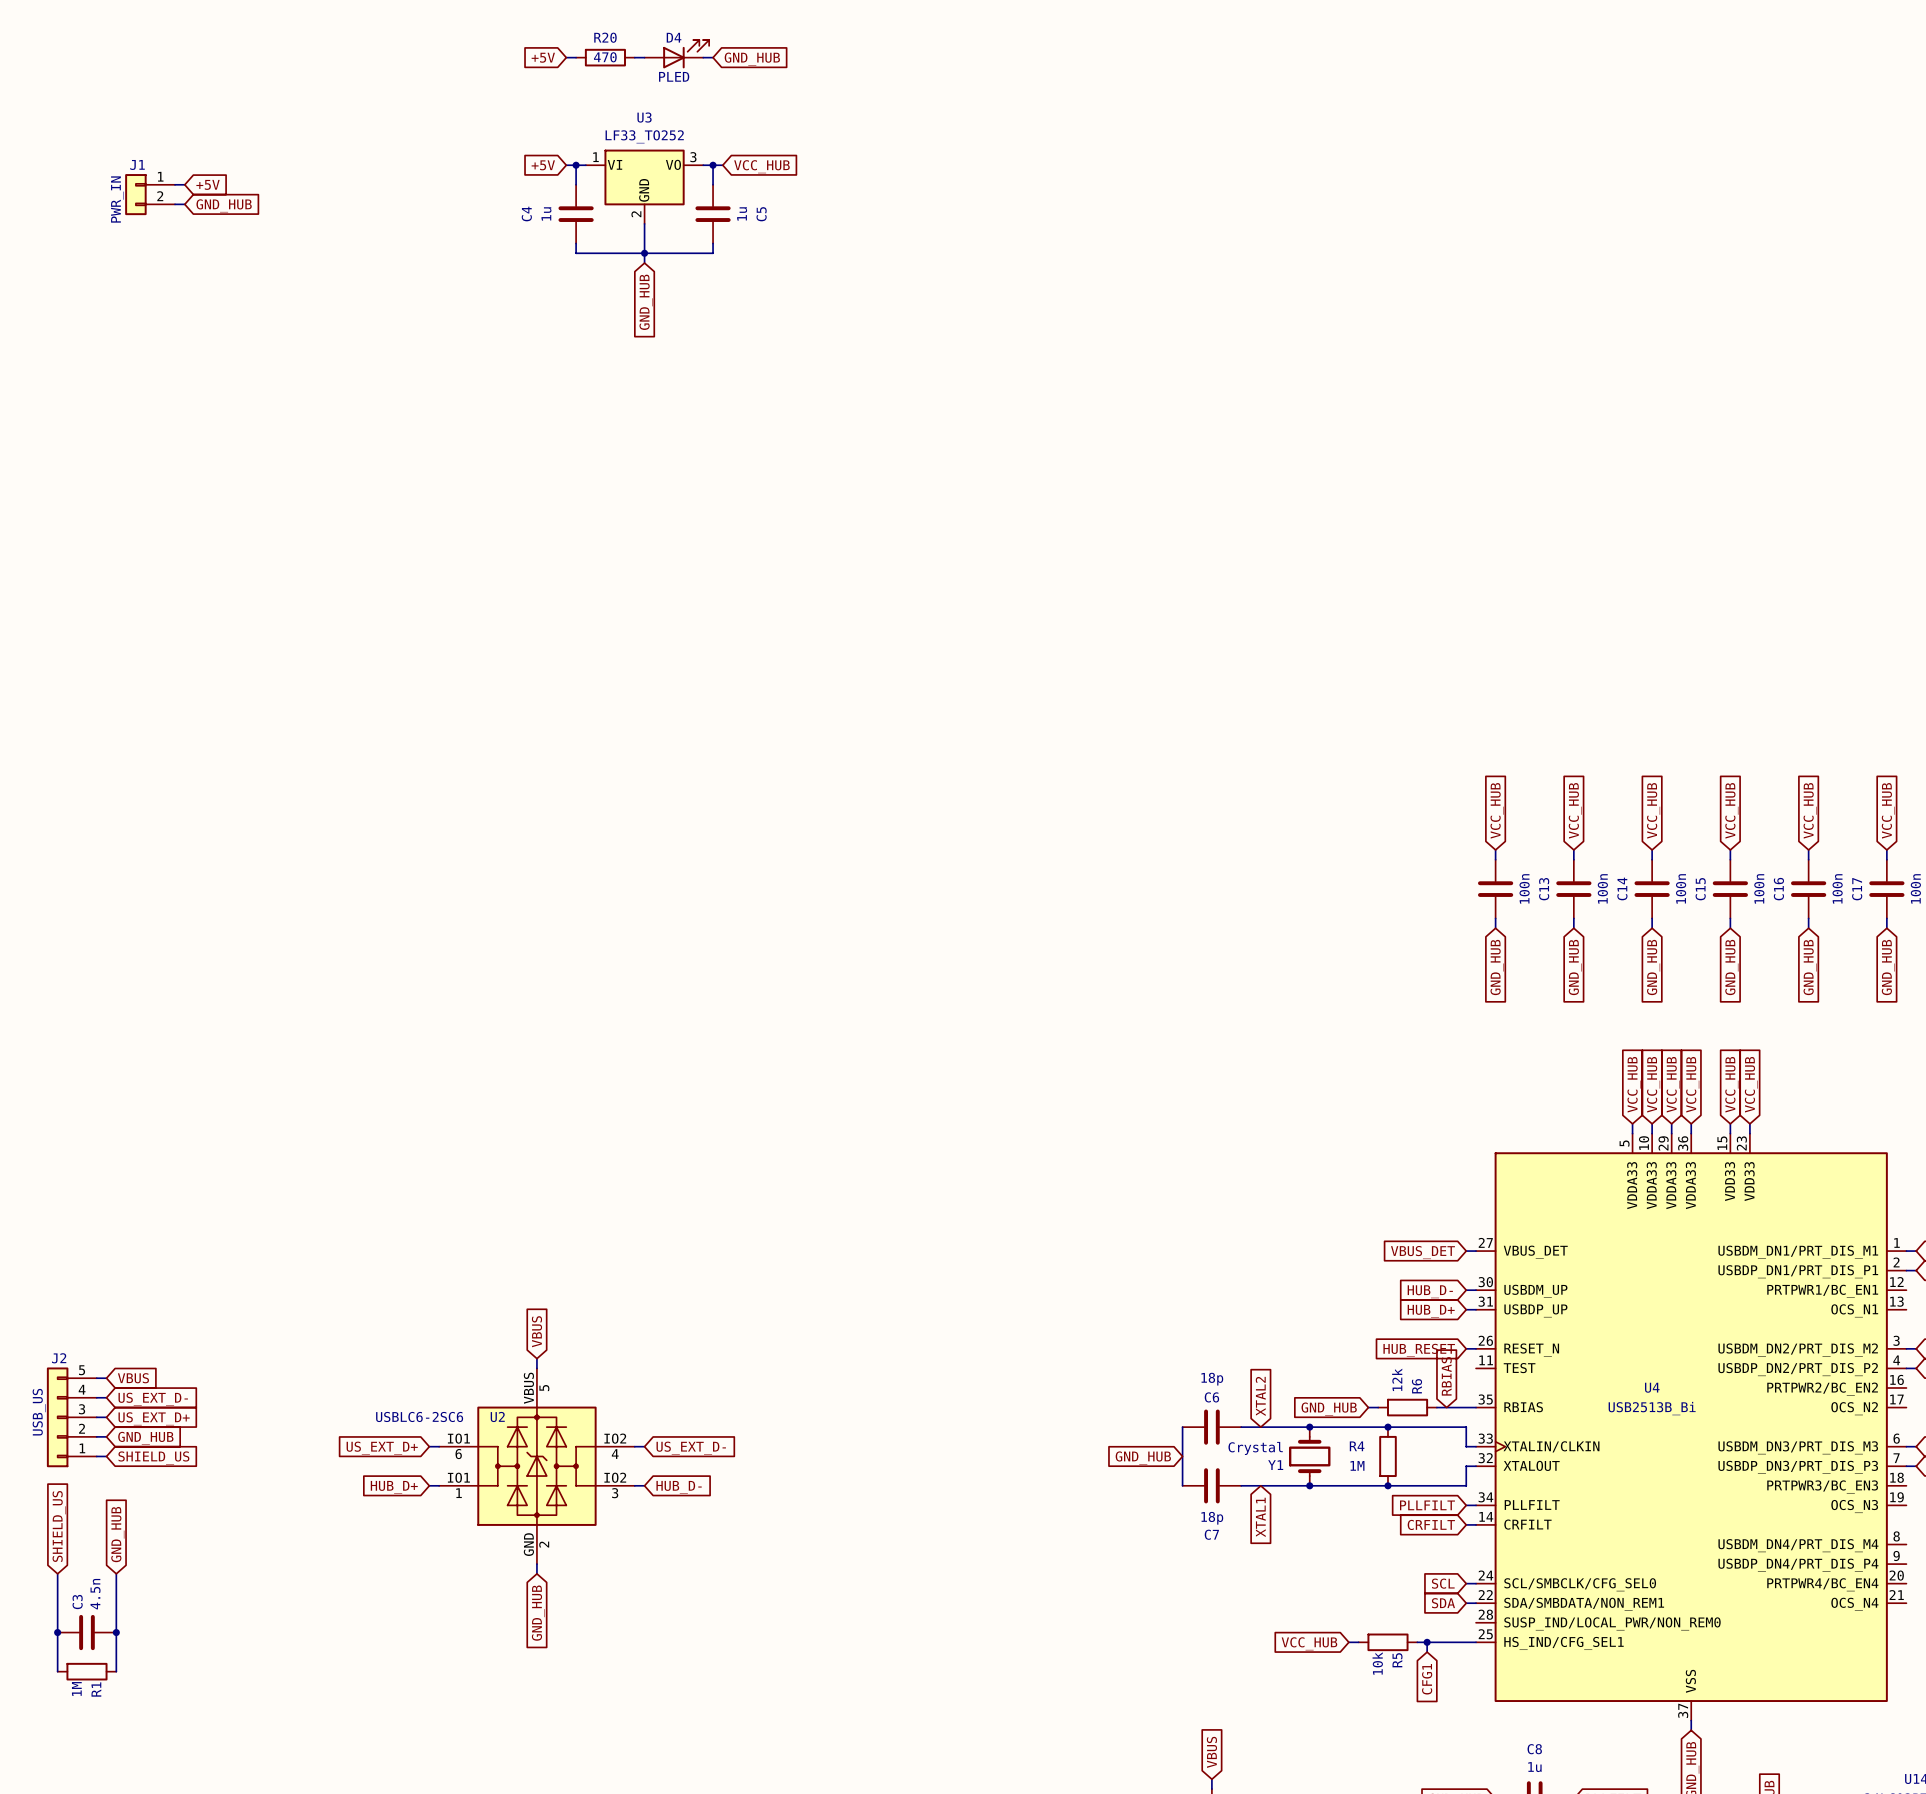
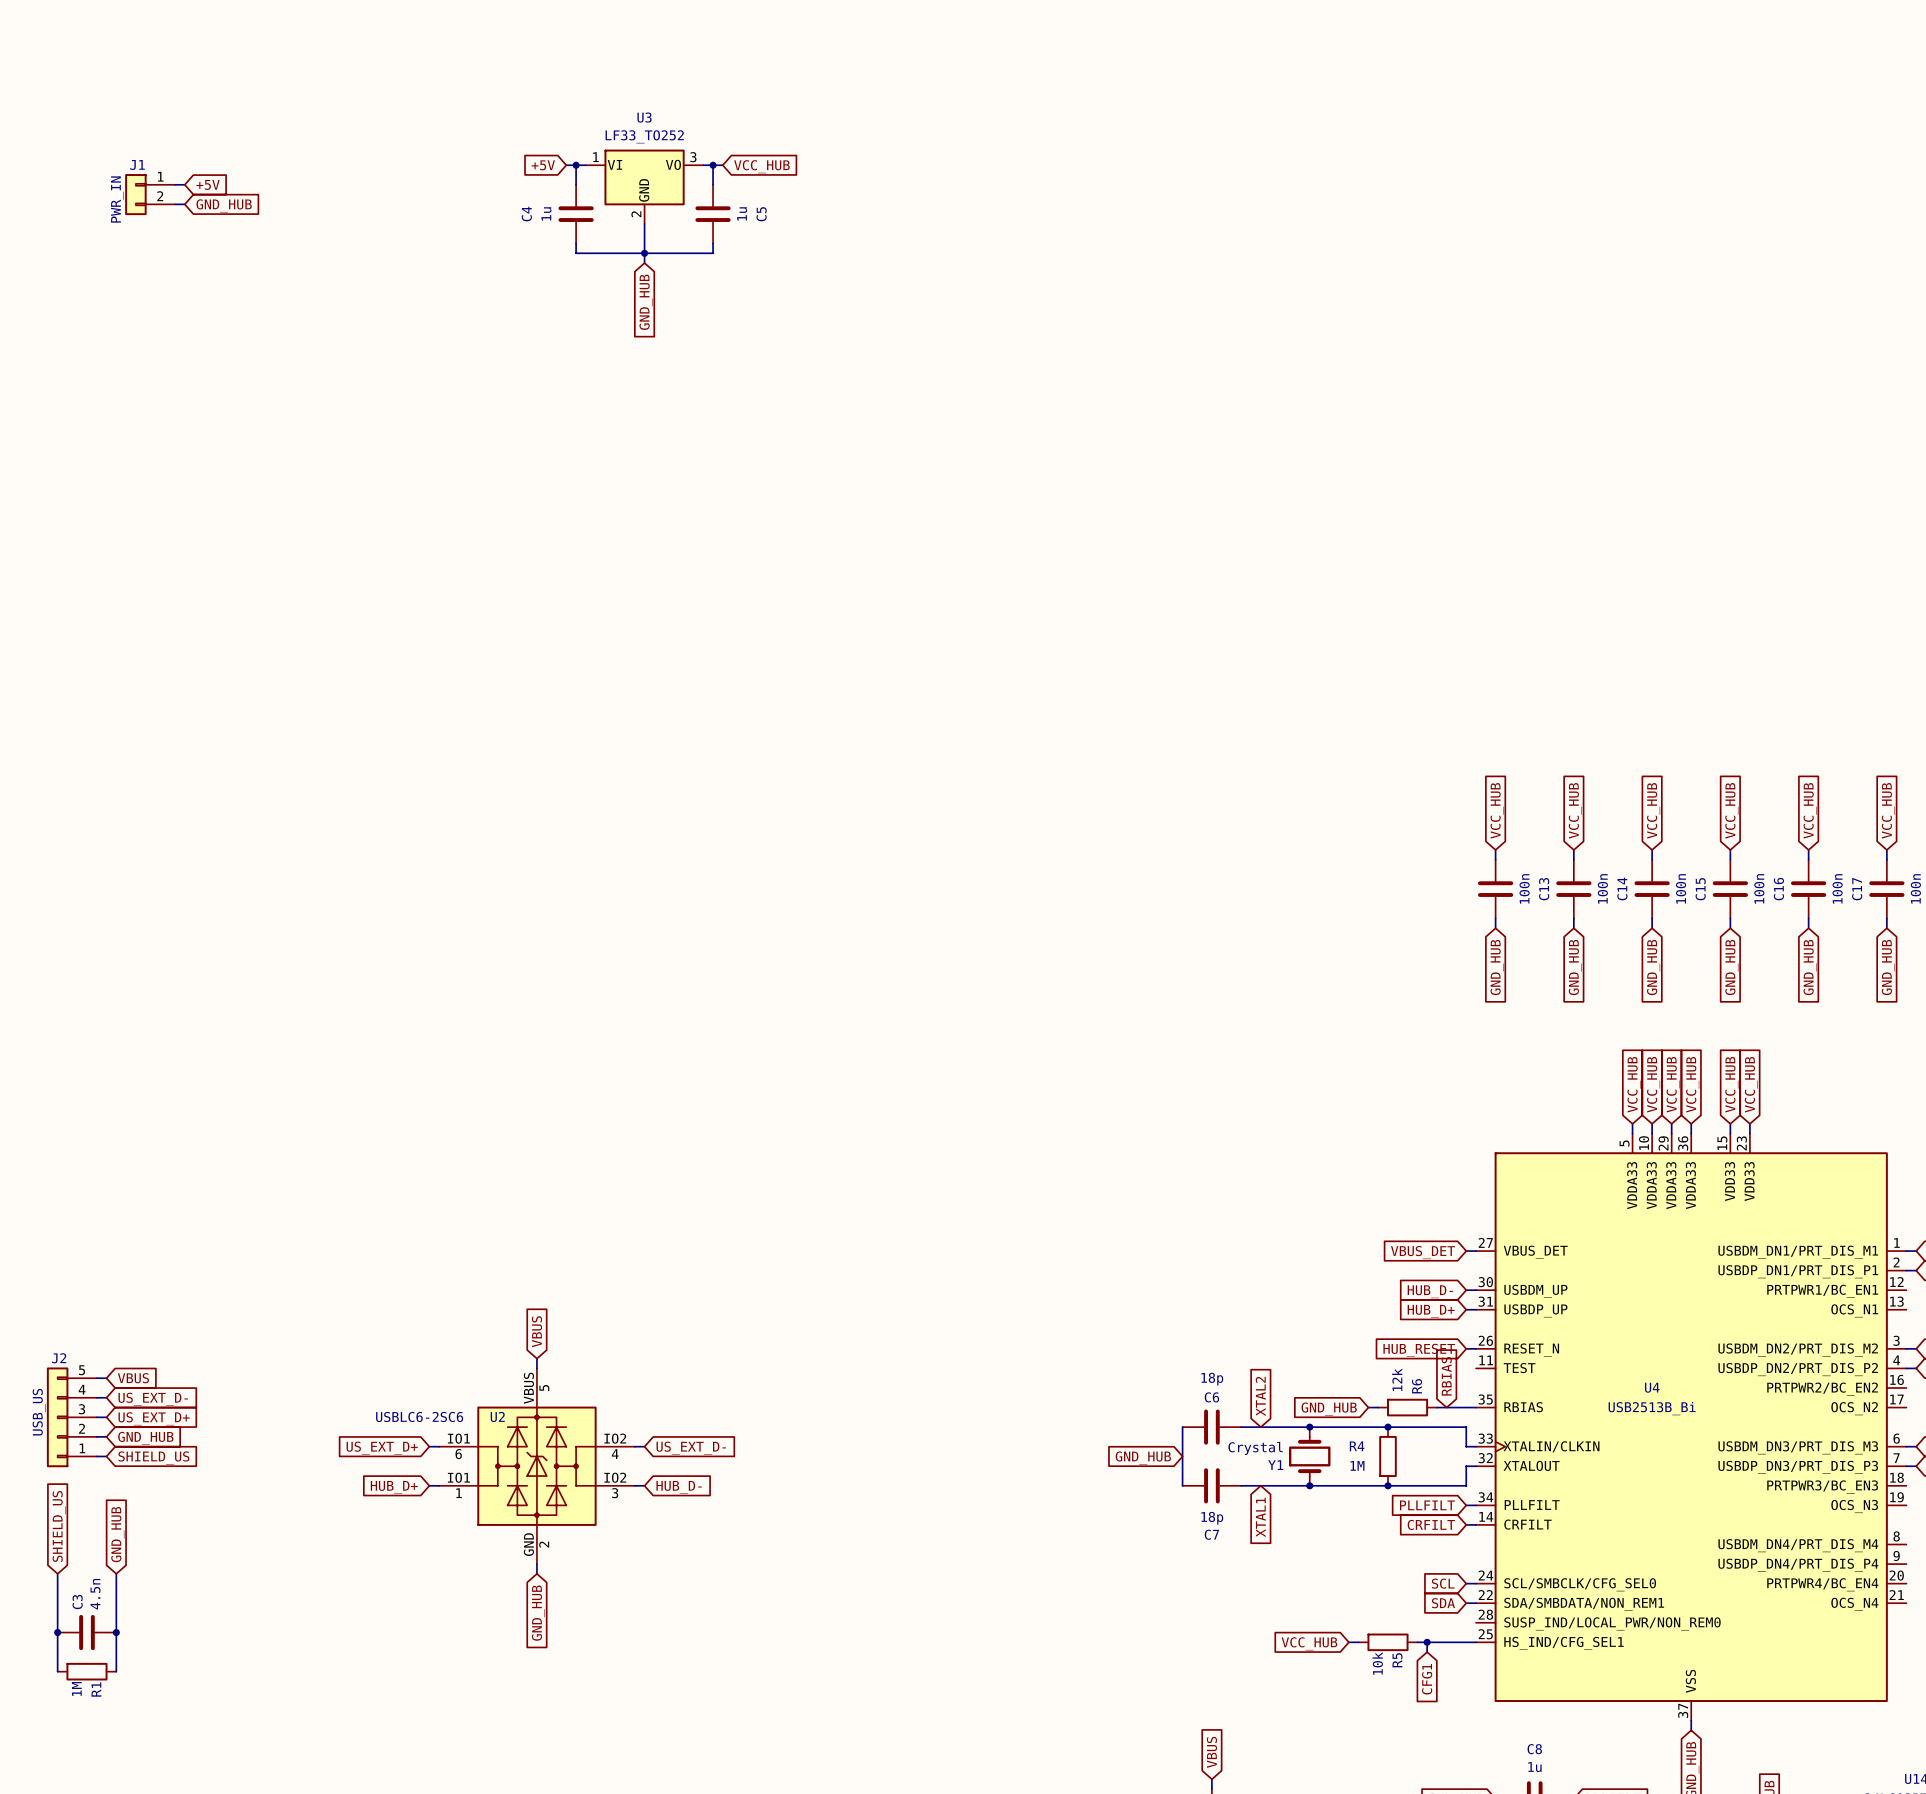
D4: PLED (676, 54) -> none
global label: +5V (543, 57) -> none
wire: (566, 57) (576, 57) -> none
R20: 470 (605, 57) -> none
wire: (634, 57) (644, 57) -> none
wire: (703, 57) (713, 57) -> none
global label: GND_HUB (752, 59) -> none

